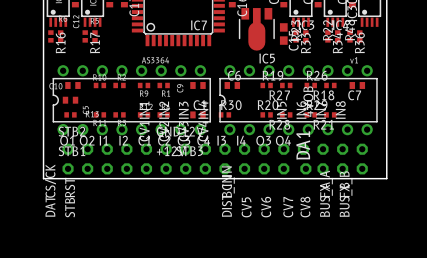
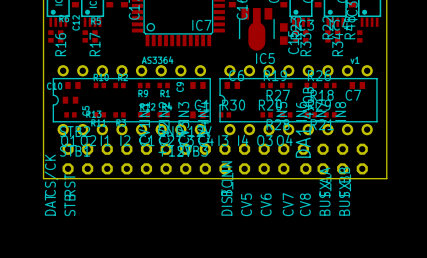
R36: (350, 36) -> none

